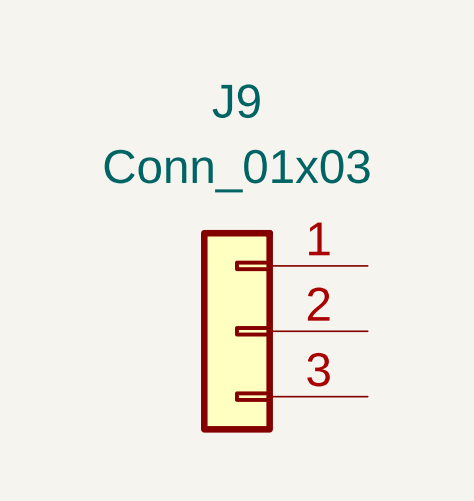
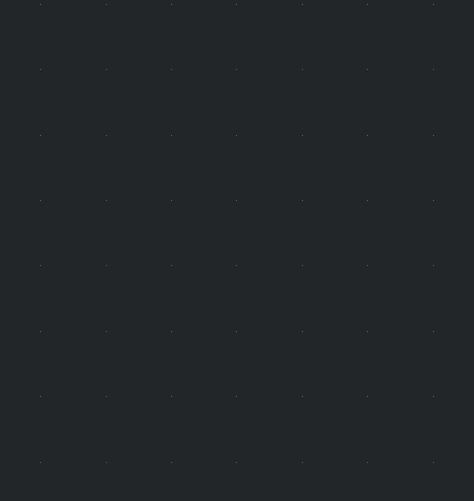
J9: Conn_01x03 (284, 331) -> none

